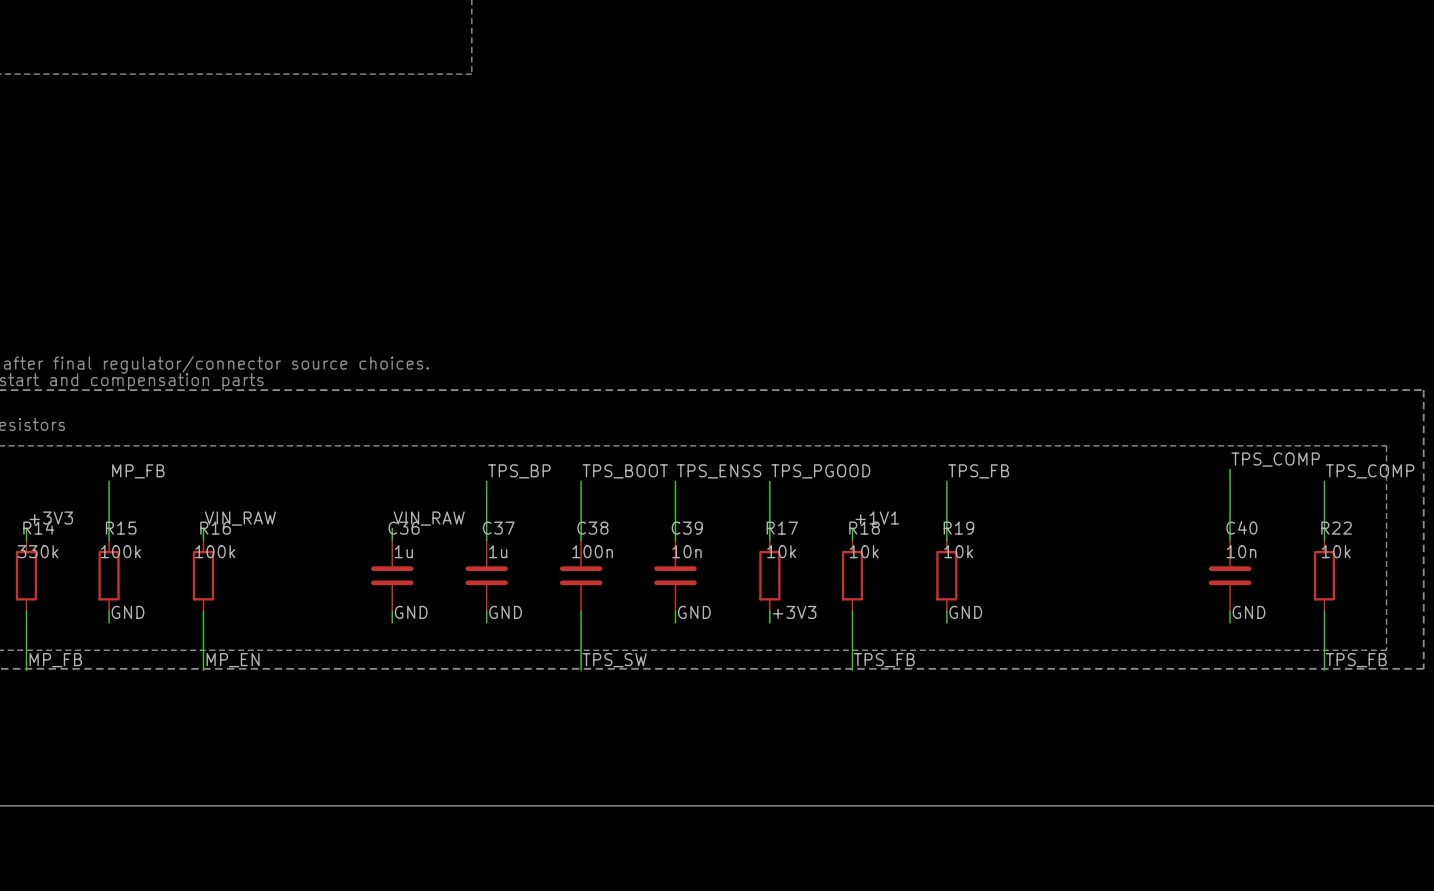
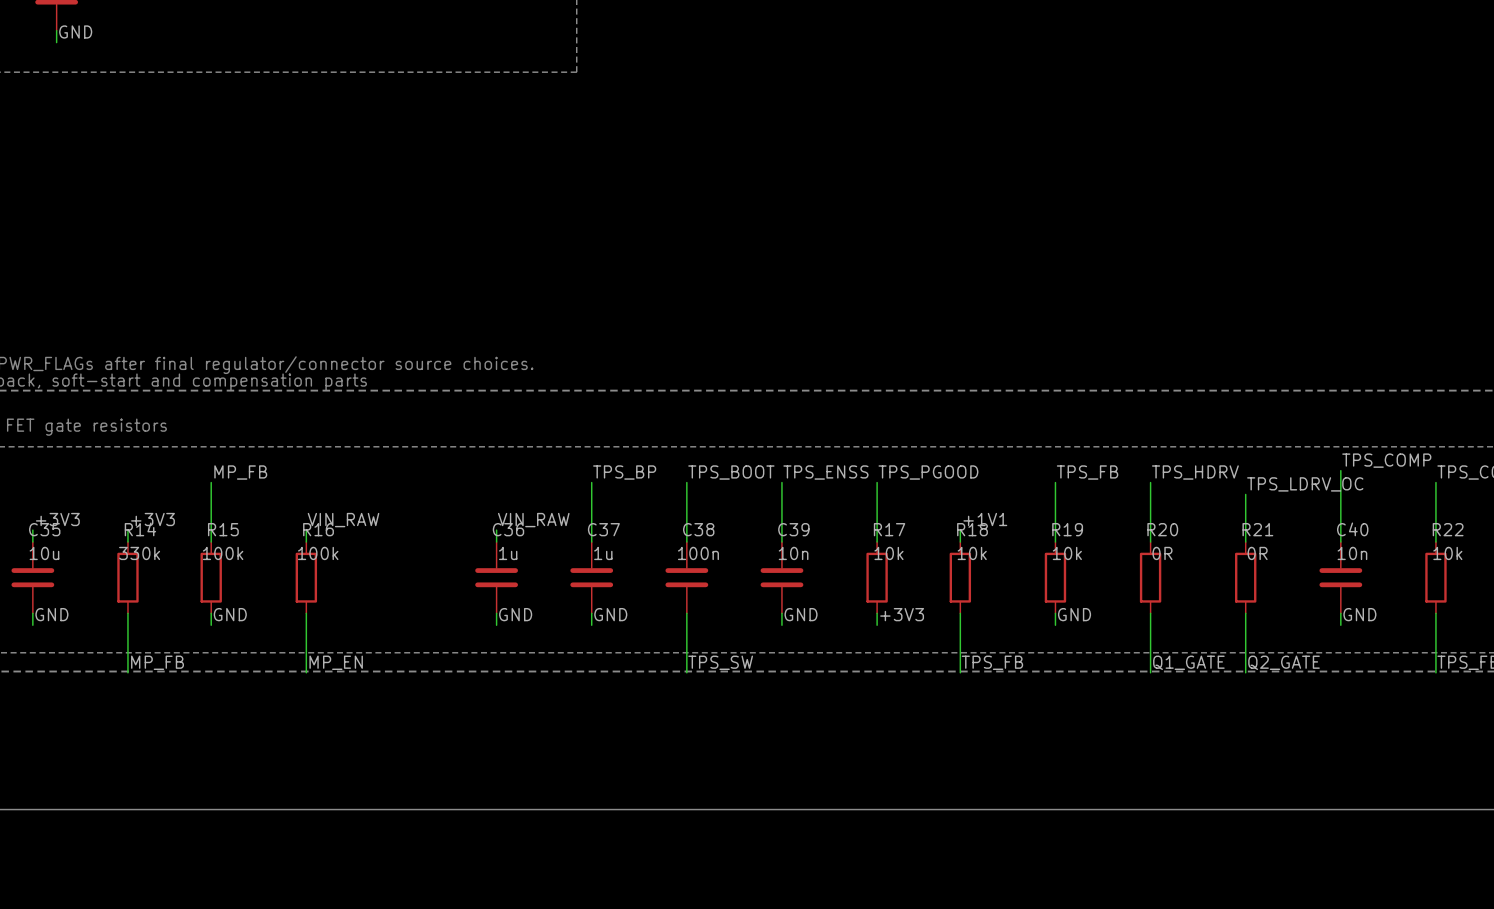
label: none -> TPS_HDRV (1195, 472)
wire: none -> (1150, 482) (1150, 542)
label: none -> TPS_LDRV_OC (1305, 484)
wire: none -> (1245, 494) (1245, 542)
R20: none -> 0R (1150, 577)
R21: none -> 0R (1245, 577)
wire: none -> (1150, 613) (1150, 672)
wire: none -> (1245, 613) (1245, 672)
label: none -> Q1_GATE (1188, 662)
label: none -> Q2_GATE (1284, 662)

